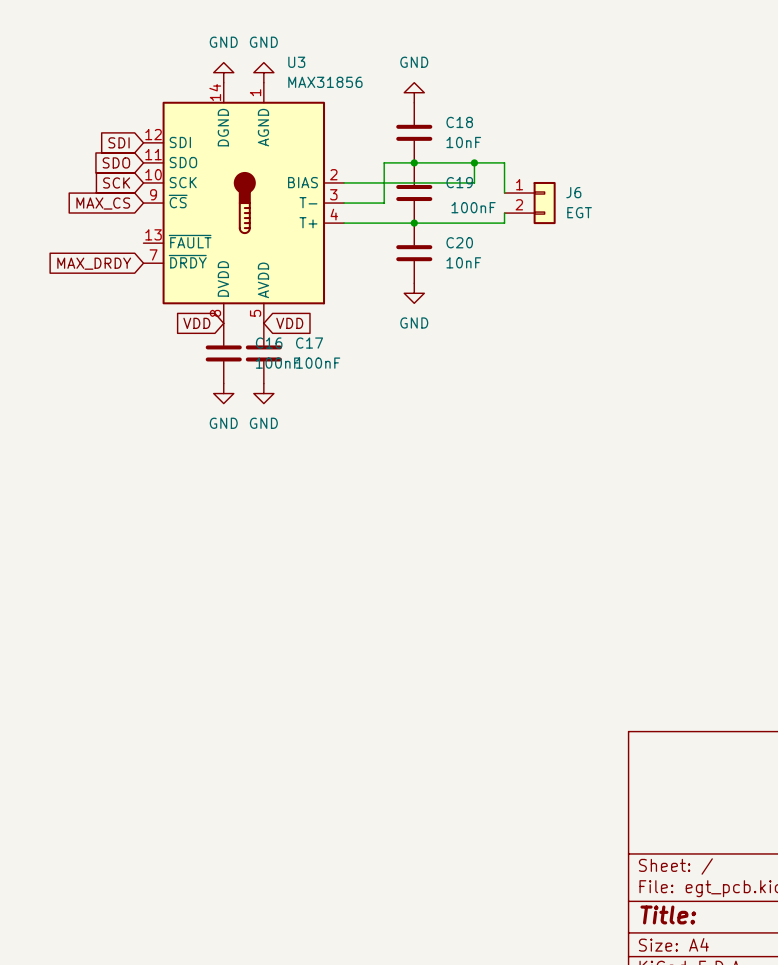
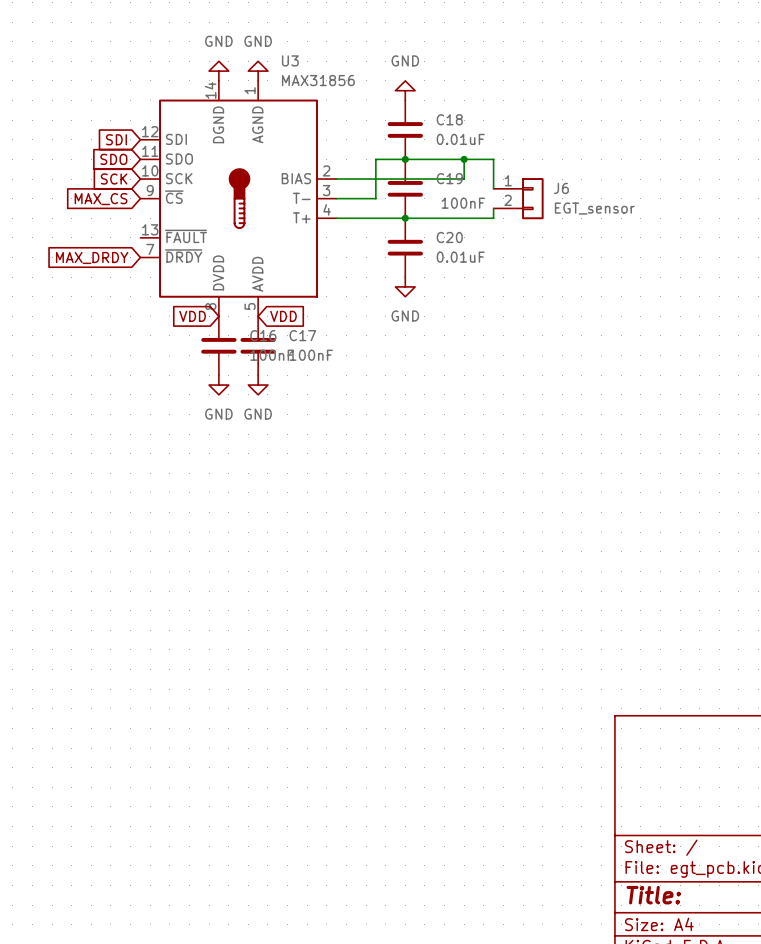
C18 value: 10nF (463, 142) -> 0.01uF (460, 139)
J6 value: EGT (579, 212) -> EGT_sensor (594, 208)
C20 value: 10nF (463, 262) -> 0.01uF (460, 257)

